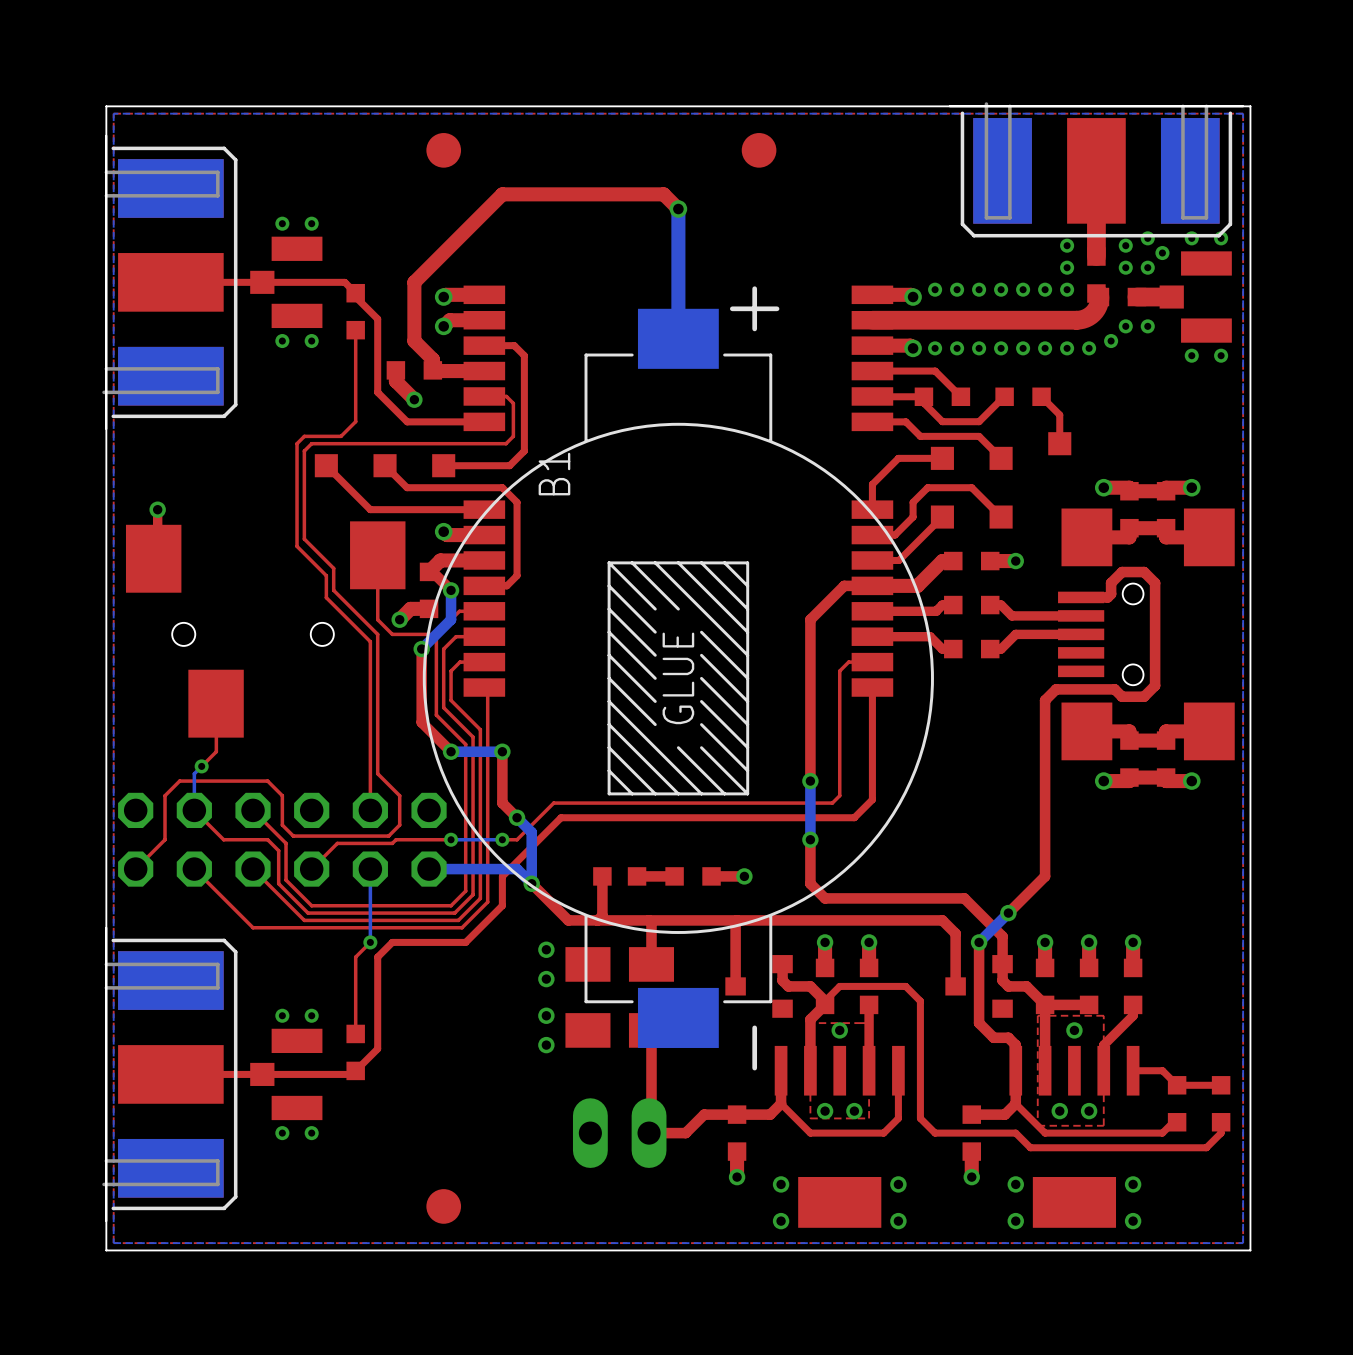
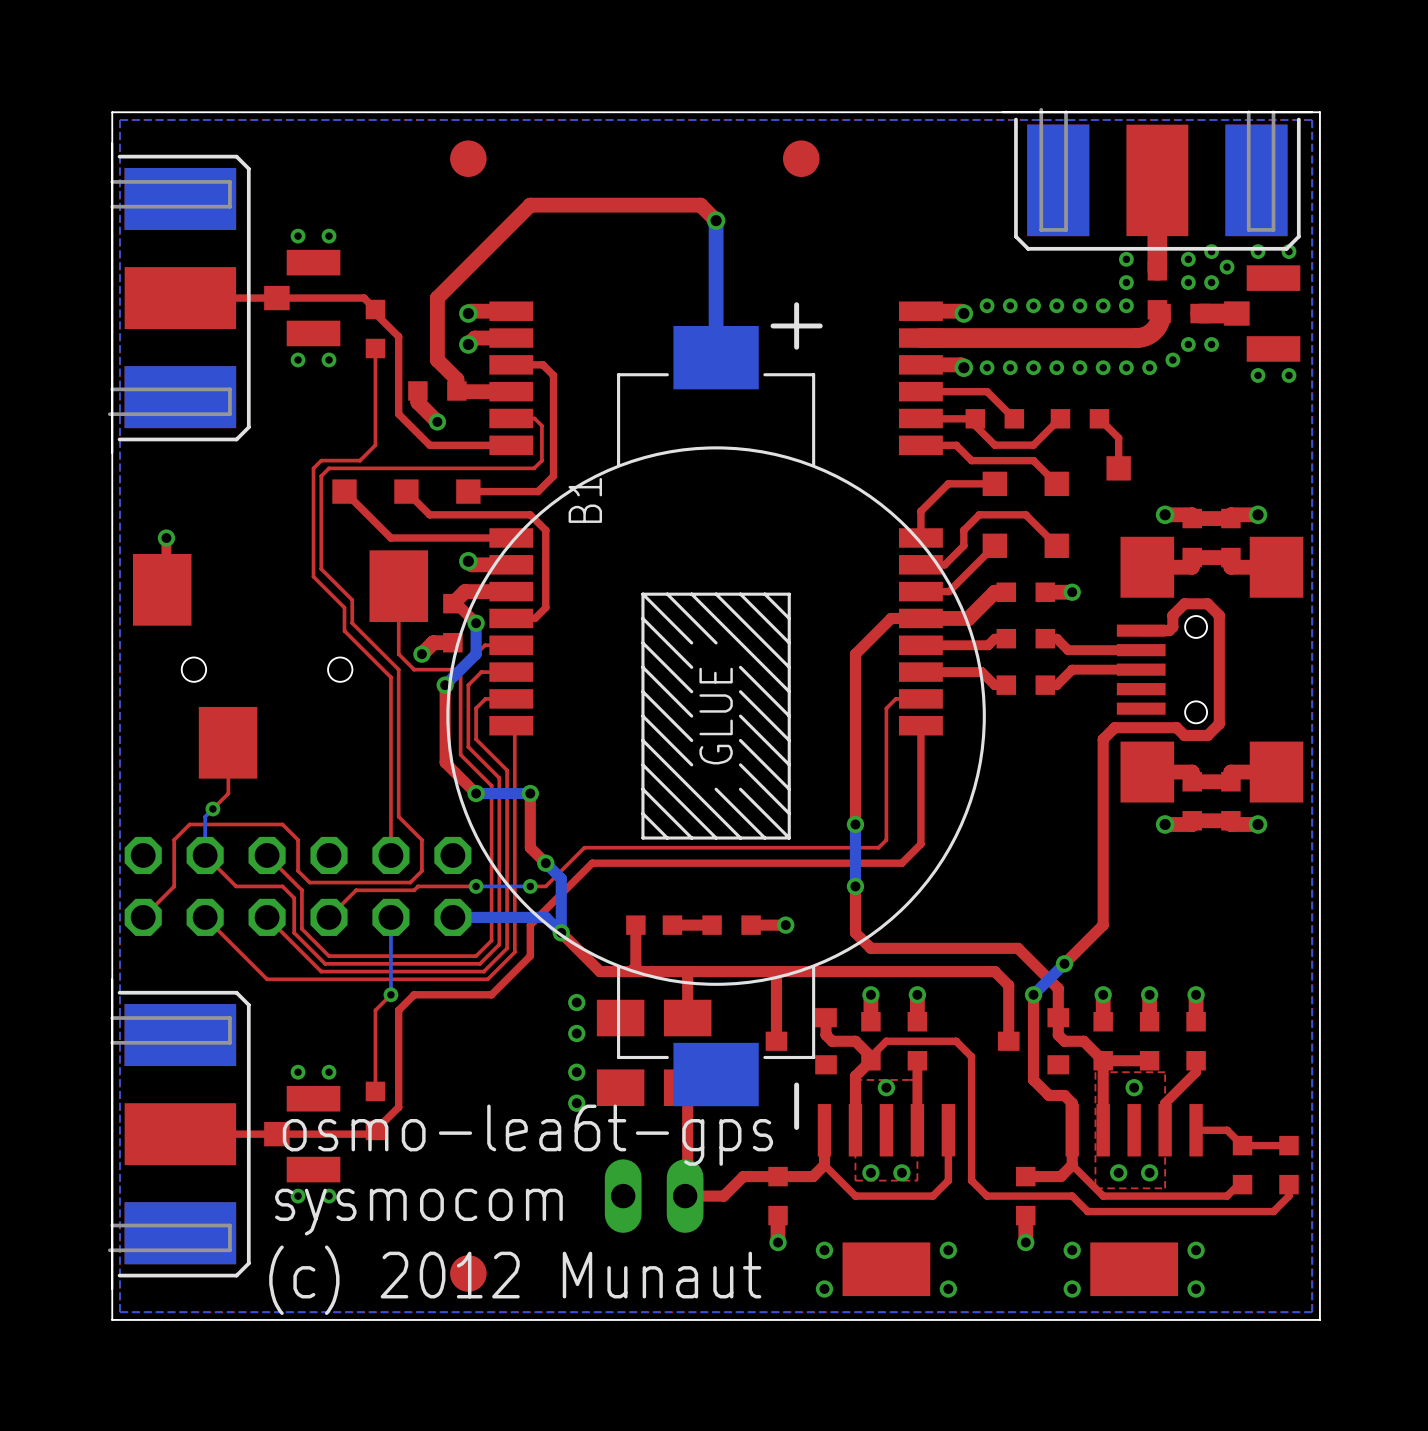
text: none -> osmo-lea6t-gps (527, 1135)
text: none -> sysmocom (418, 1212)
text: none -> (c) 2012 Munaut (515, 1280)

